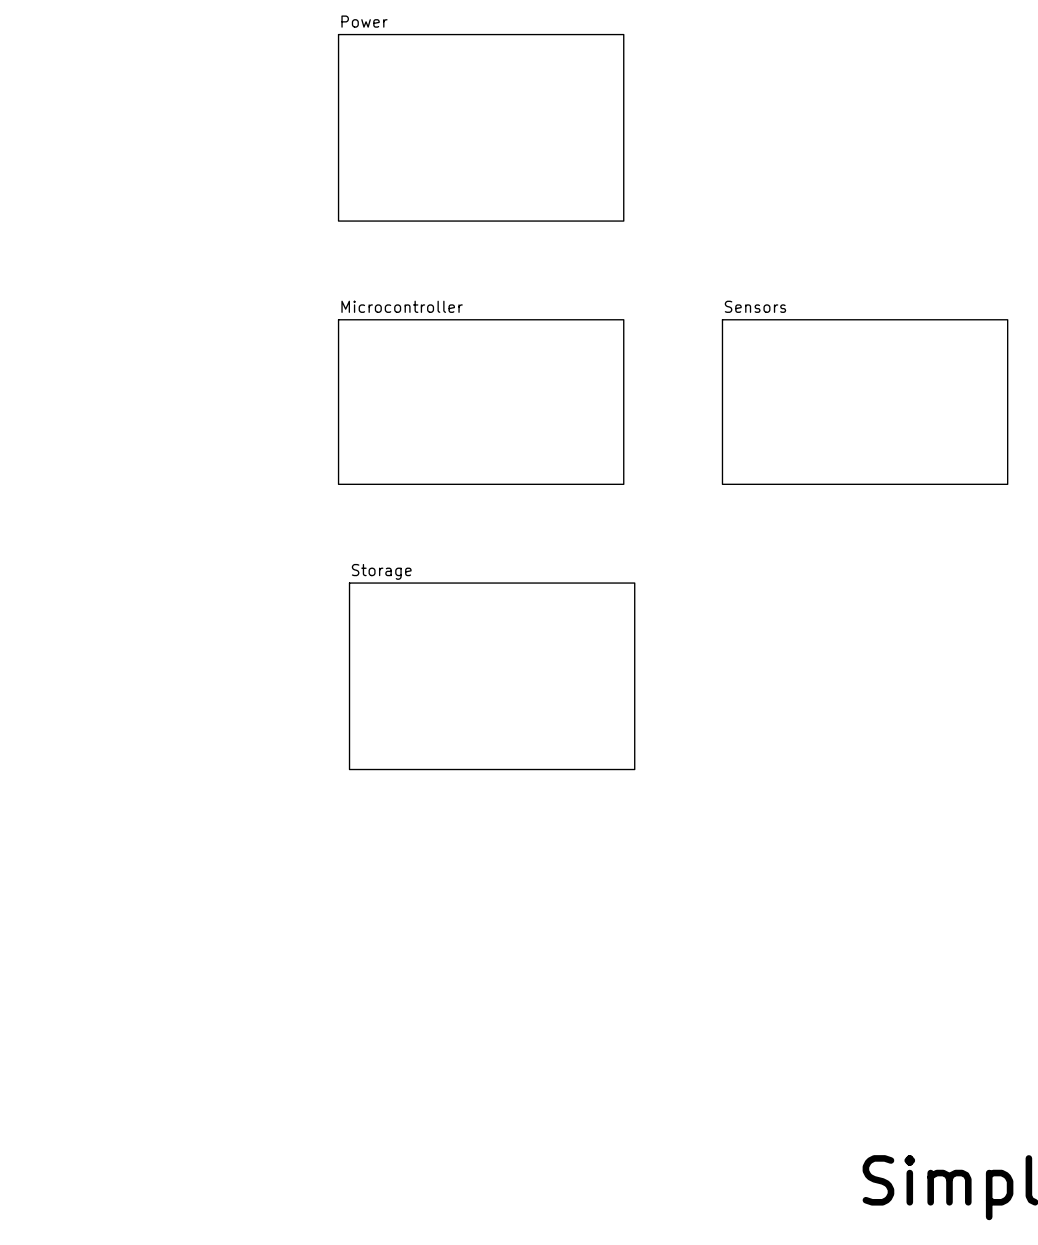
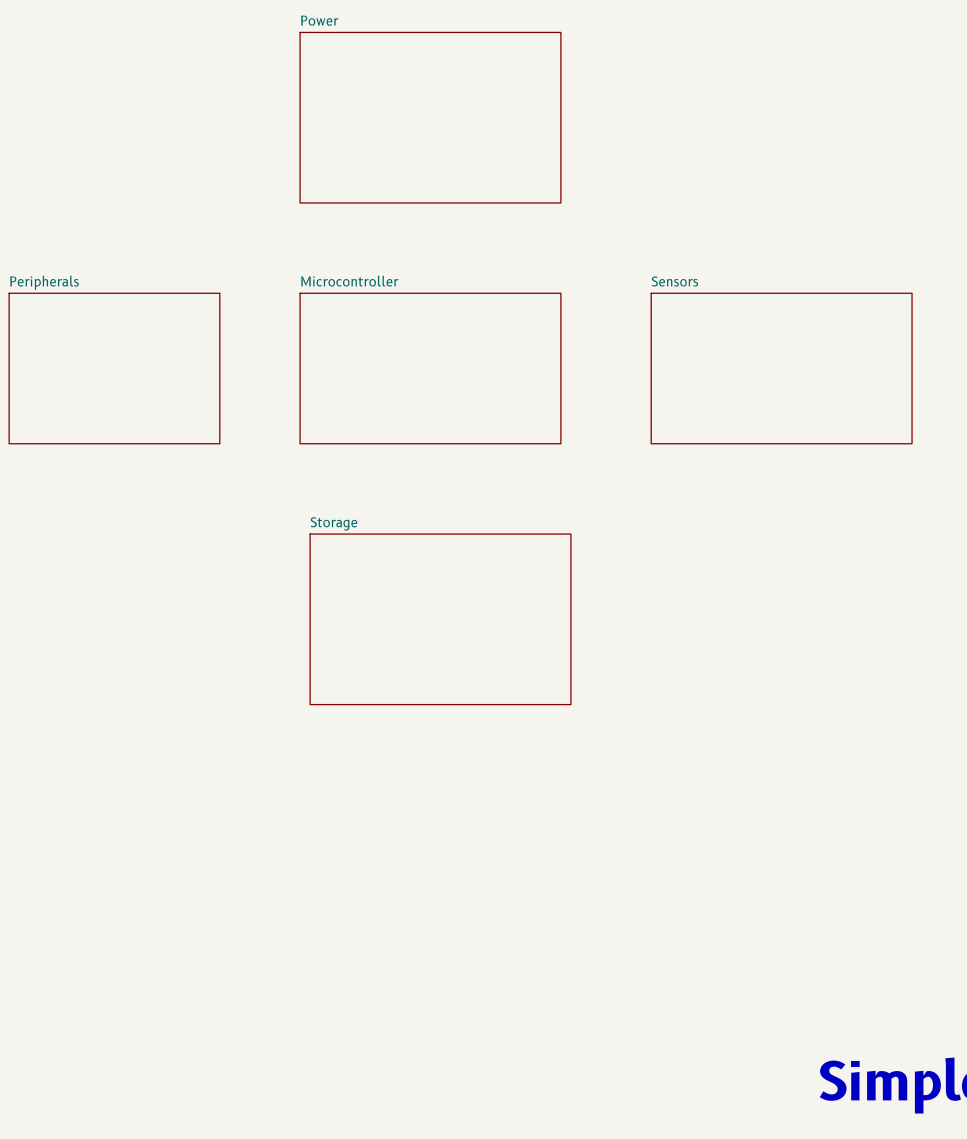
sheet Peripherals: none -> (114, 368)

